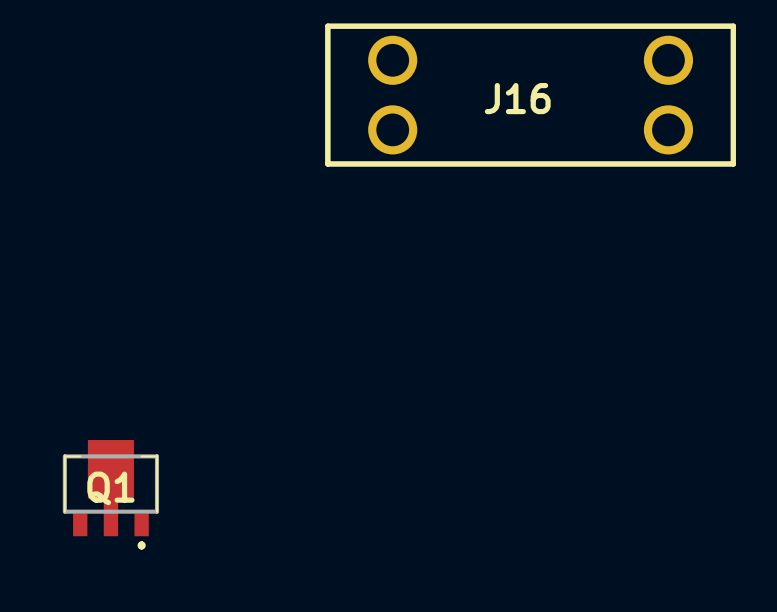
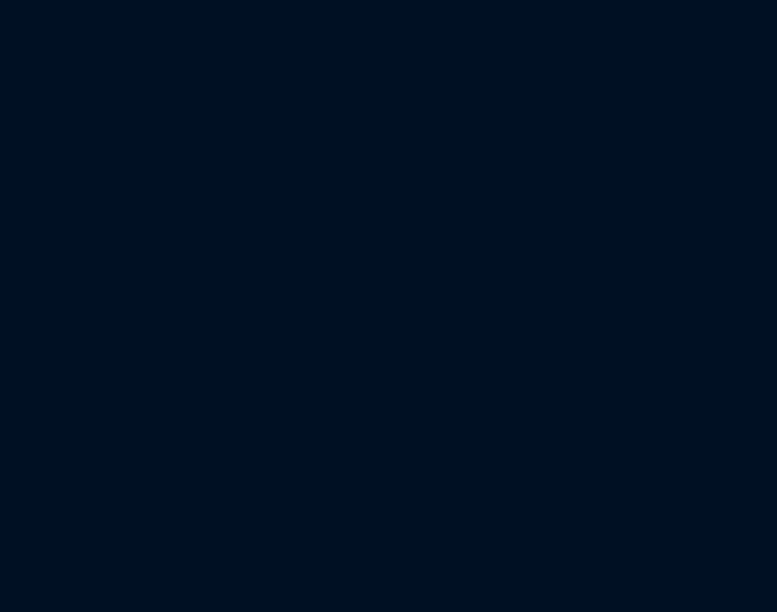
J16: (530, 95) -> none
Q1: (110, 494) -> none

